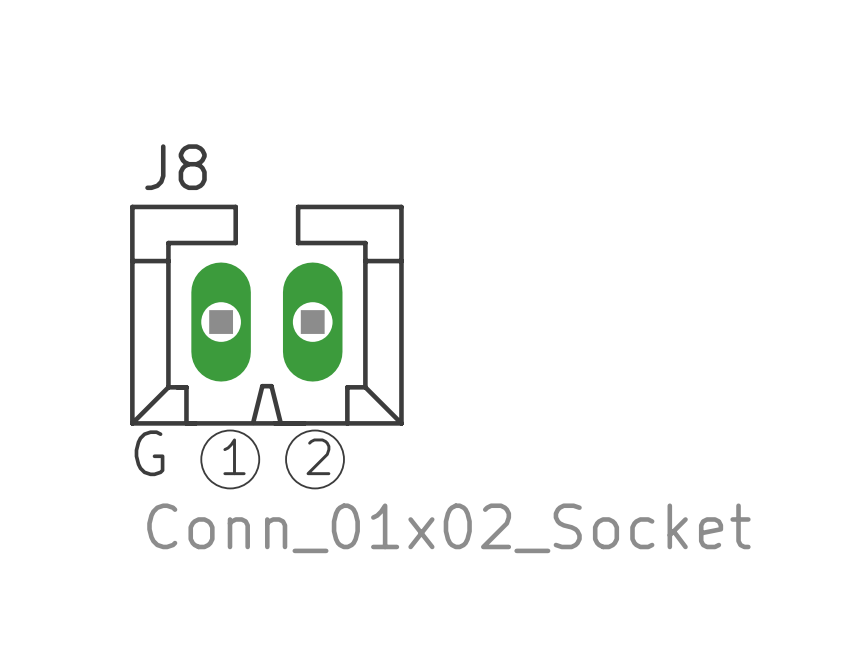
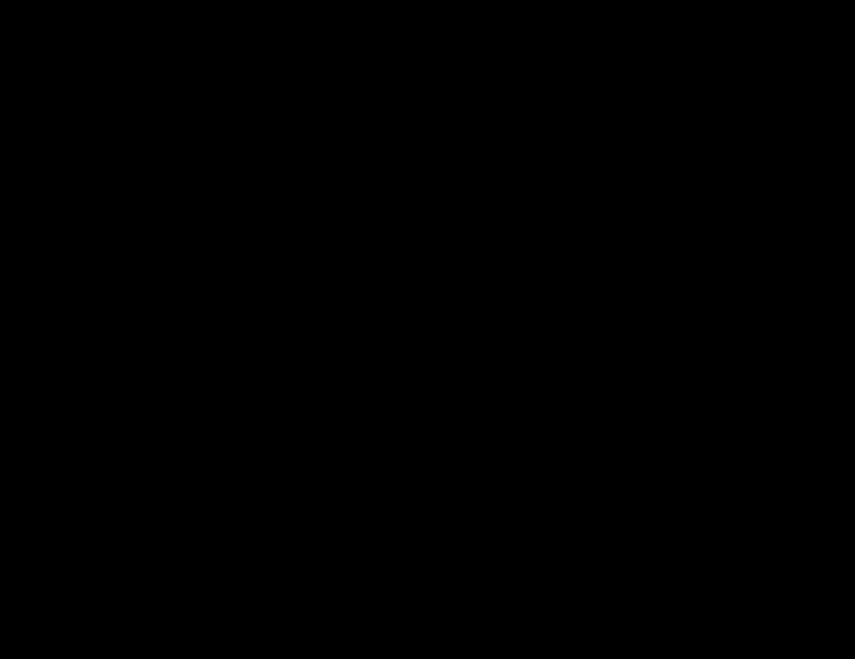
J8: Conn_01x02_Socket (266, 347) -> none

